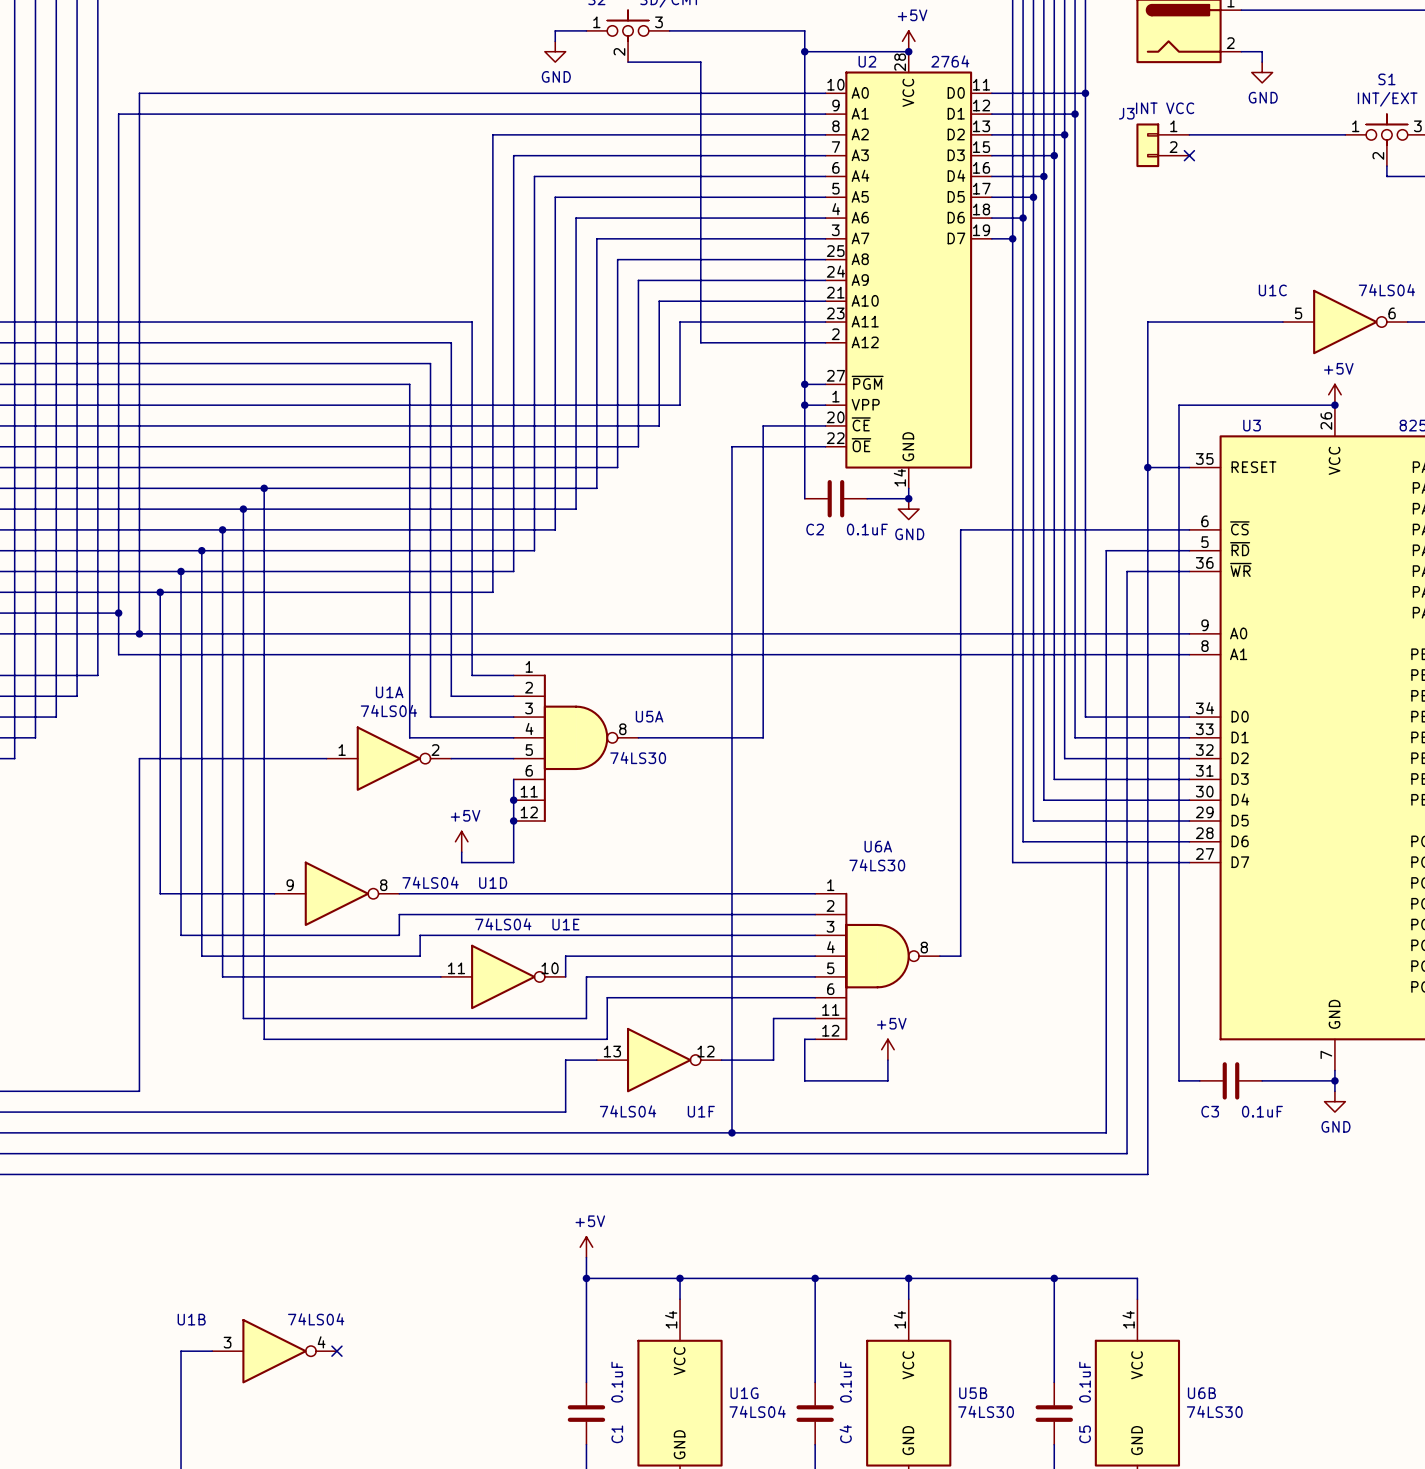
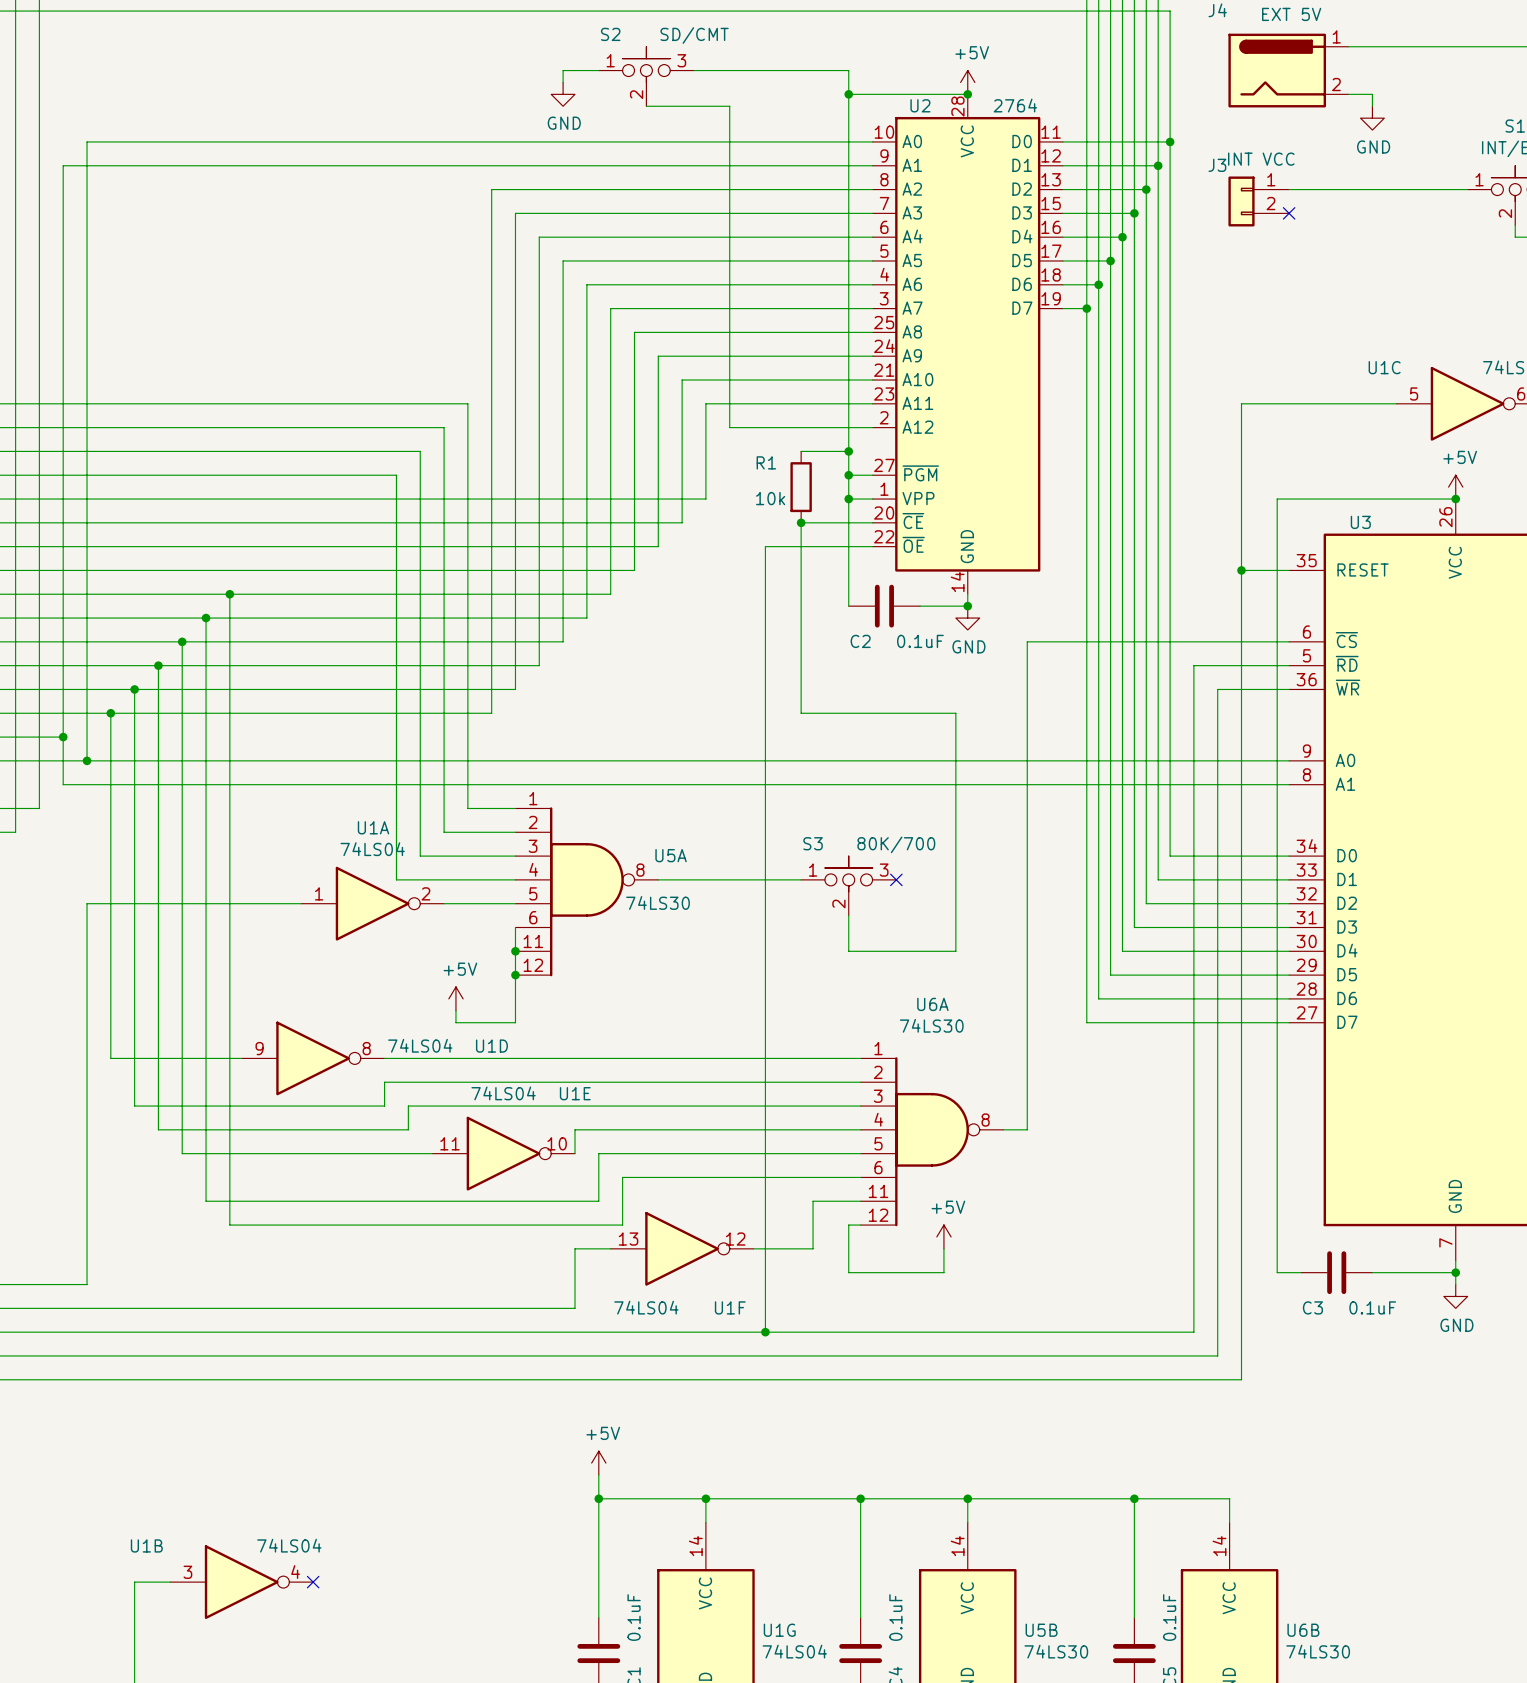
wire: none -> (801, 451) (848, 451)
junction: none -> (848, 451)
R1: none -> 10k (801, 487)
junction: none -> (801, 522)
wire: (763, 592) (763, 737) -> (801, 713) (955, 713) (955, 951) (848, 951) (848, 915)
no-connect mark: none -> (896, 879)
S3: none -> 80K/700 (848, 885)

